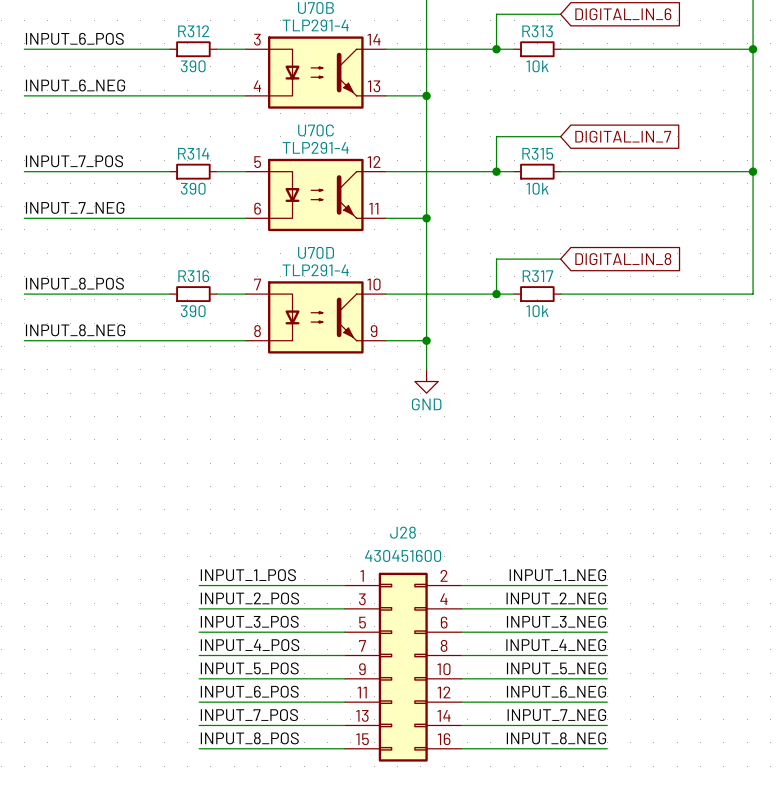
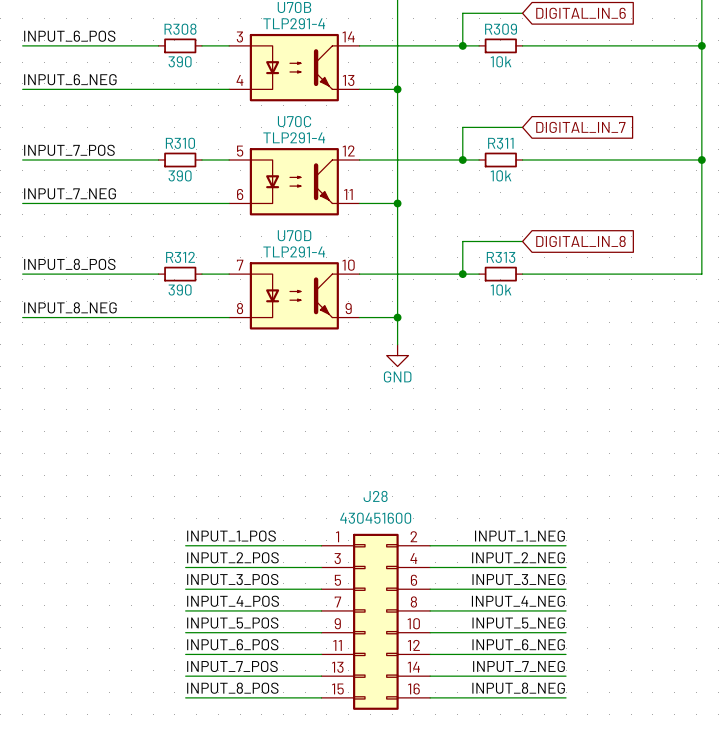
R312 name: R312 (193, 31) -> R308 (180, 29)
R313 name: R313 (537, 31) -> R309 (501, 29)
R314 name: R314 (193, 153) -> R310 (180, 143)
R315 name: R315 (537, 153) -> R311 (500, 143)
R316 name: R316 (193, 276) -> R312 (180, 257)
R317 name: R317 (537, 276) -> R313 (501, 257)

